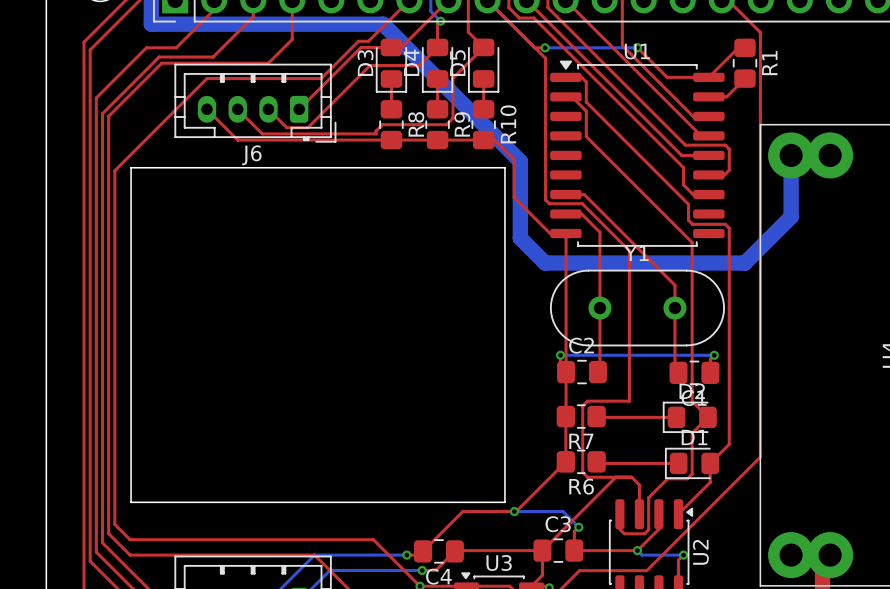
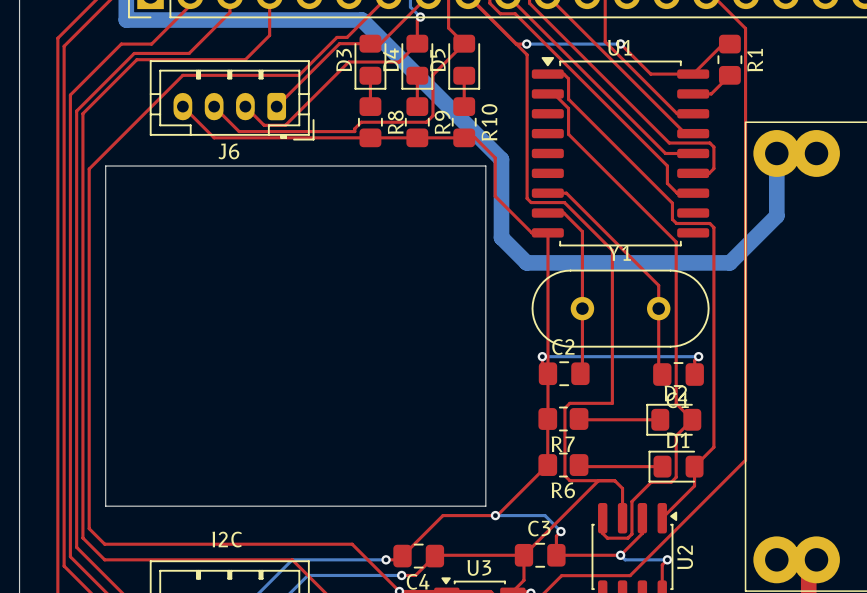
text: none -> I2C (227, 539)

